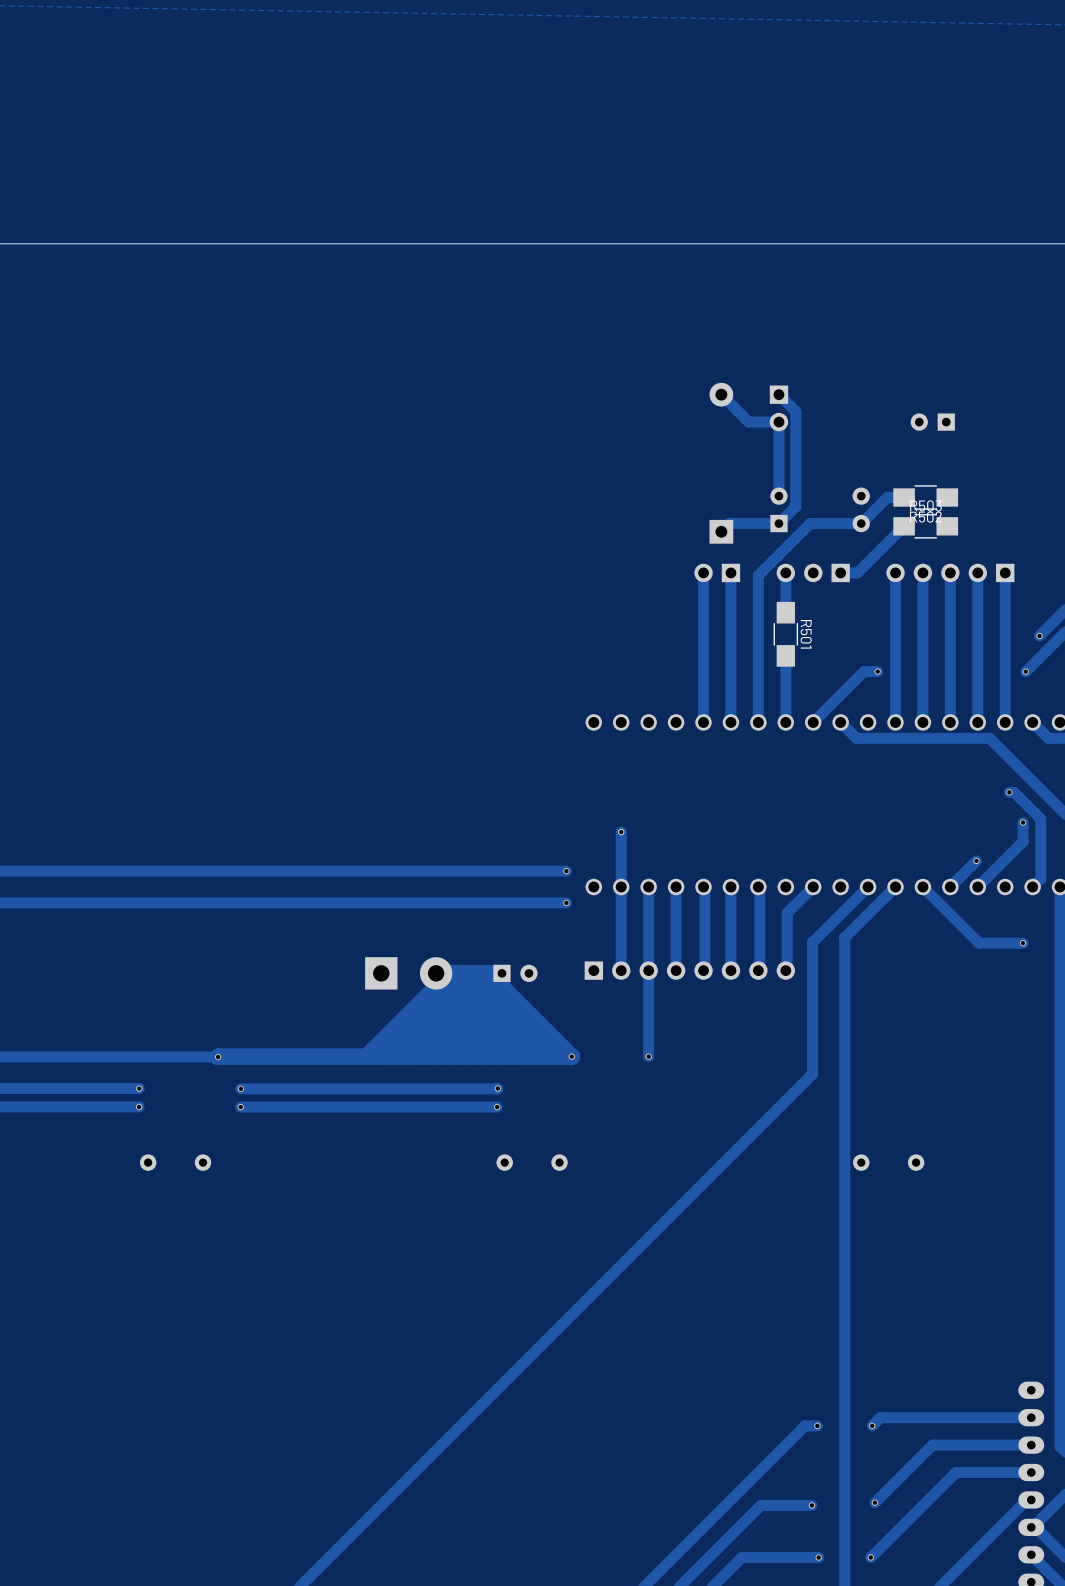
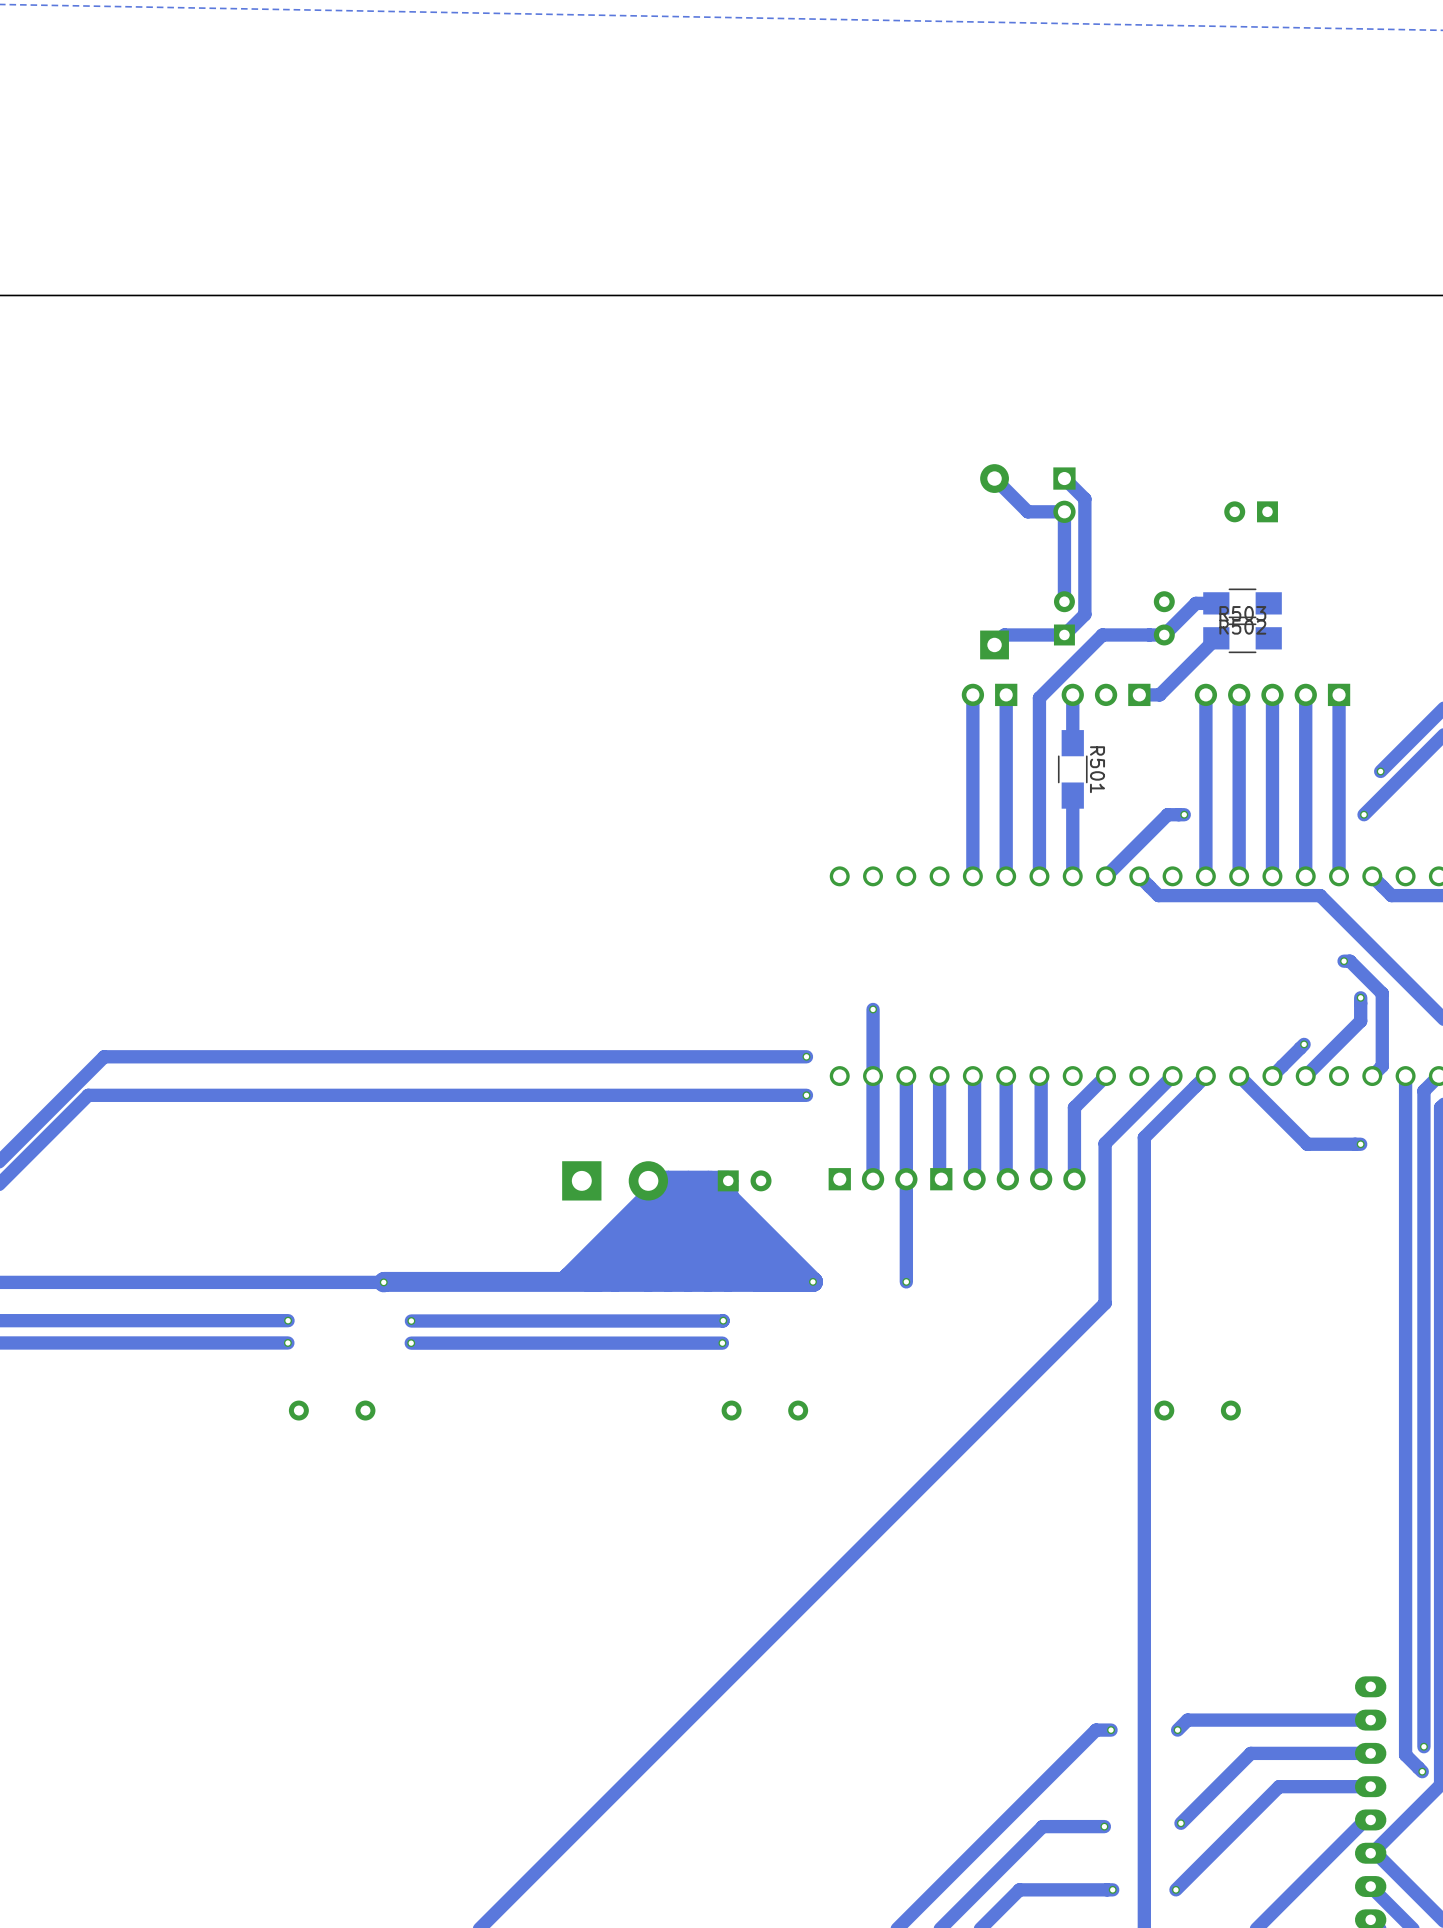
part: (689, 970) -> none
part: none -> (873, 1179)
part: none -> (1007, 1179)

